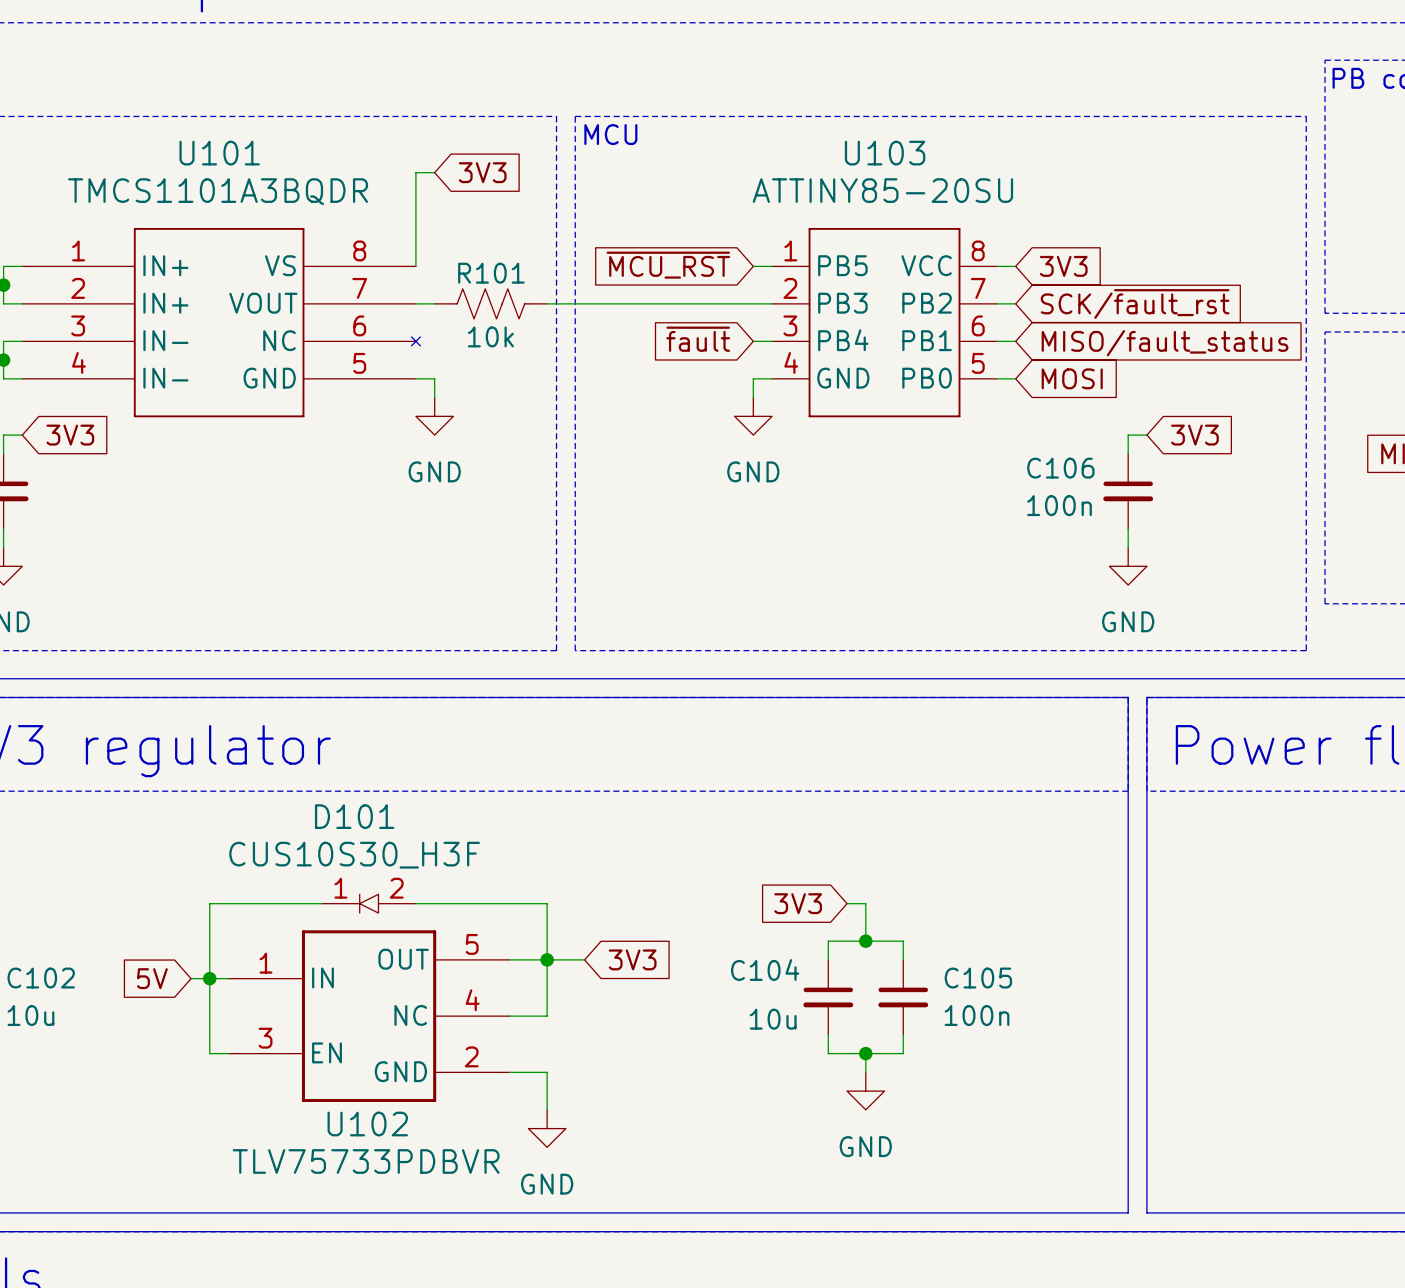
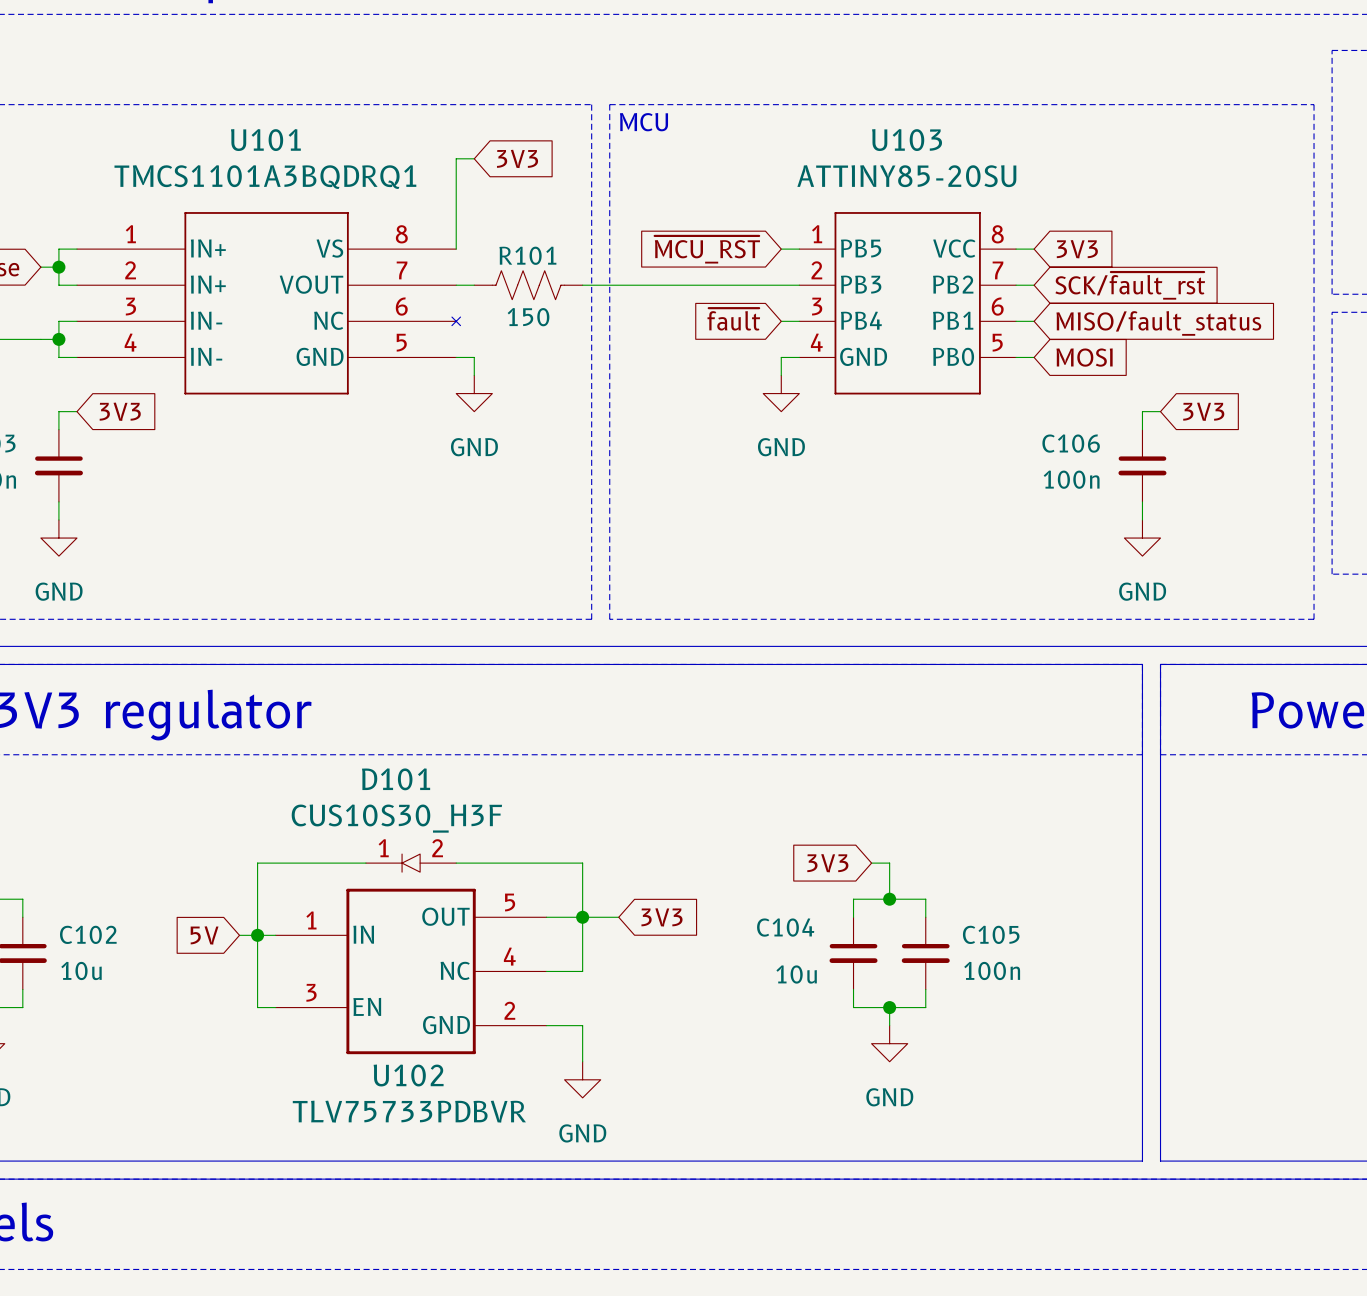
U101 value: TMCS1101A3BQDR (218, 191) -> TMCS1101A3BQDRQ1 (265, 177)
R101 value: 10k (490, 336) -> 150 (528, 317)

